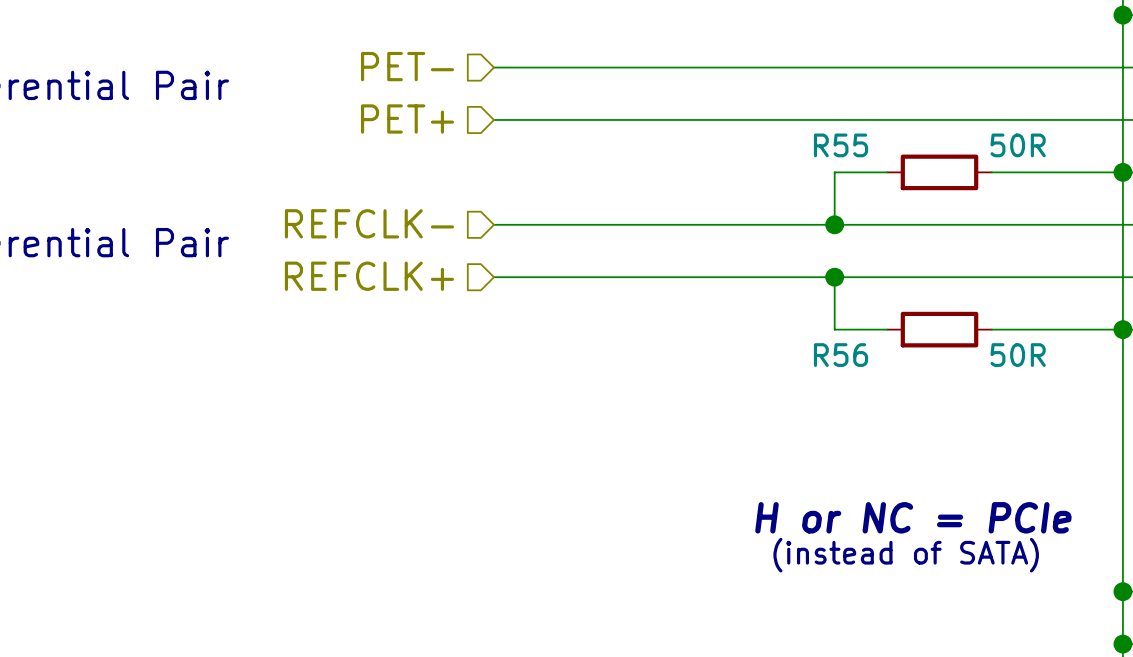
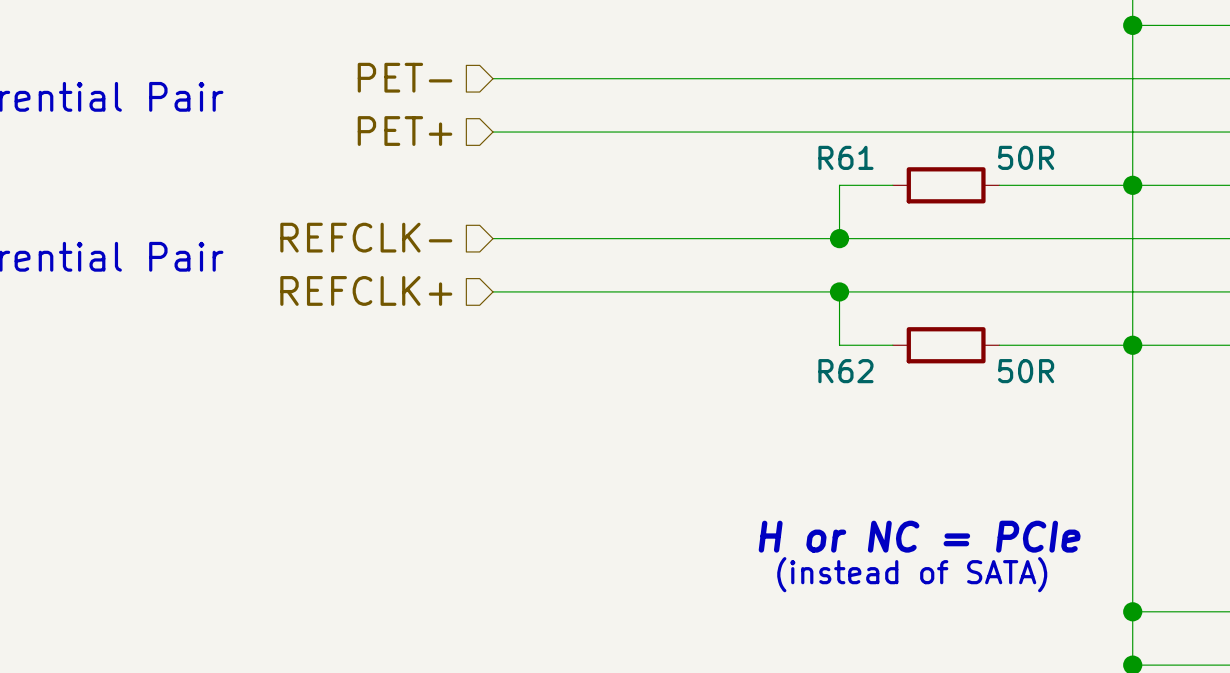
R55 name: R55 (841, 145) -> R61 (845, 157)
R56 name: R56 (841, 355) -> R62 (845, 371)

